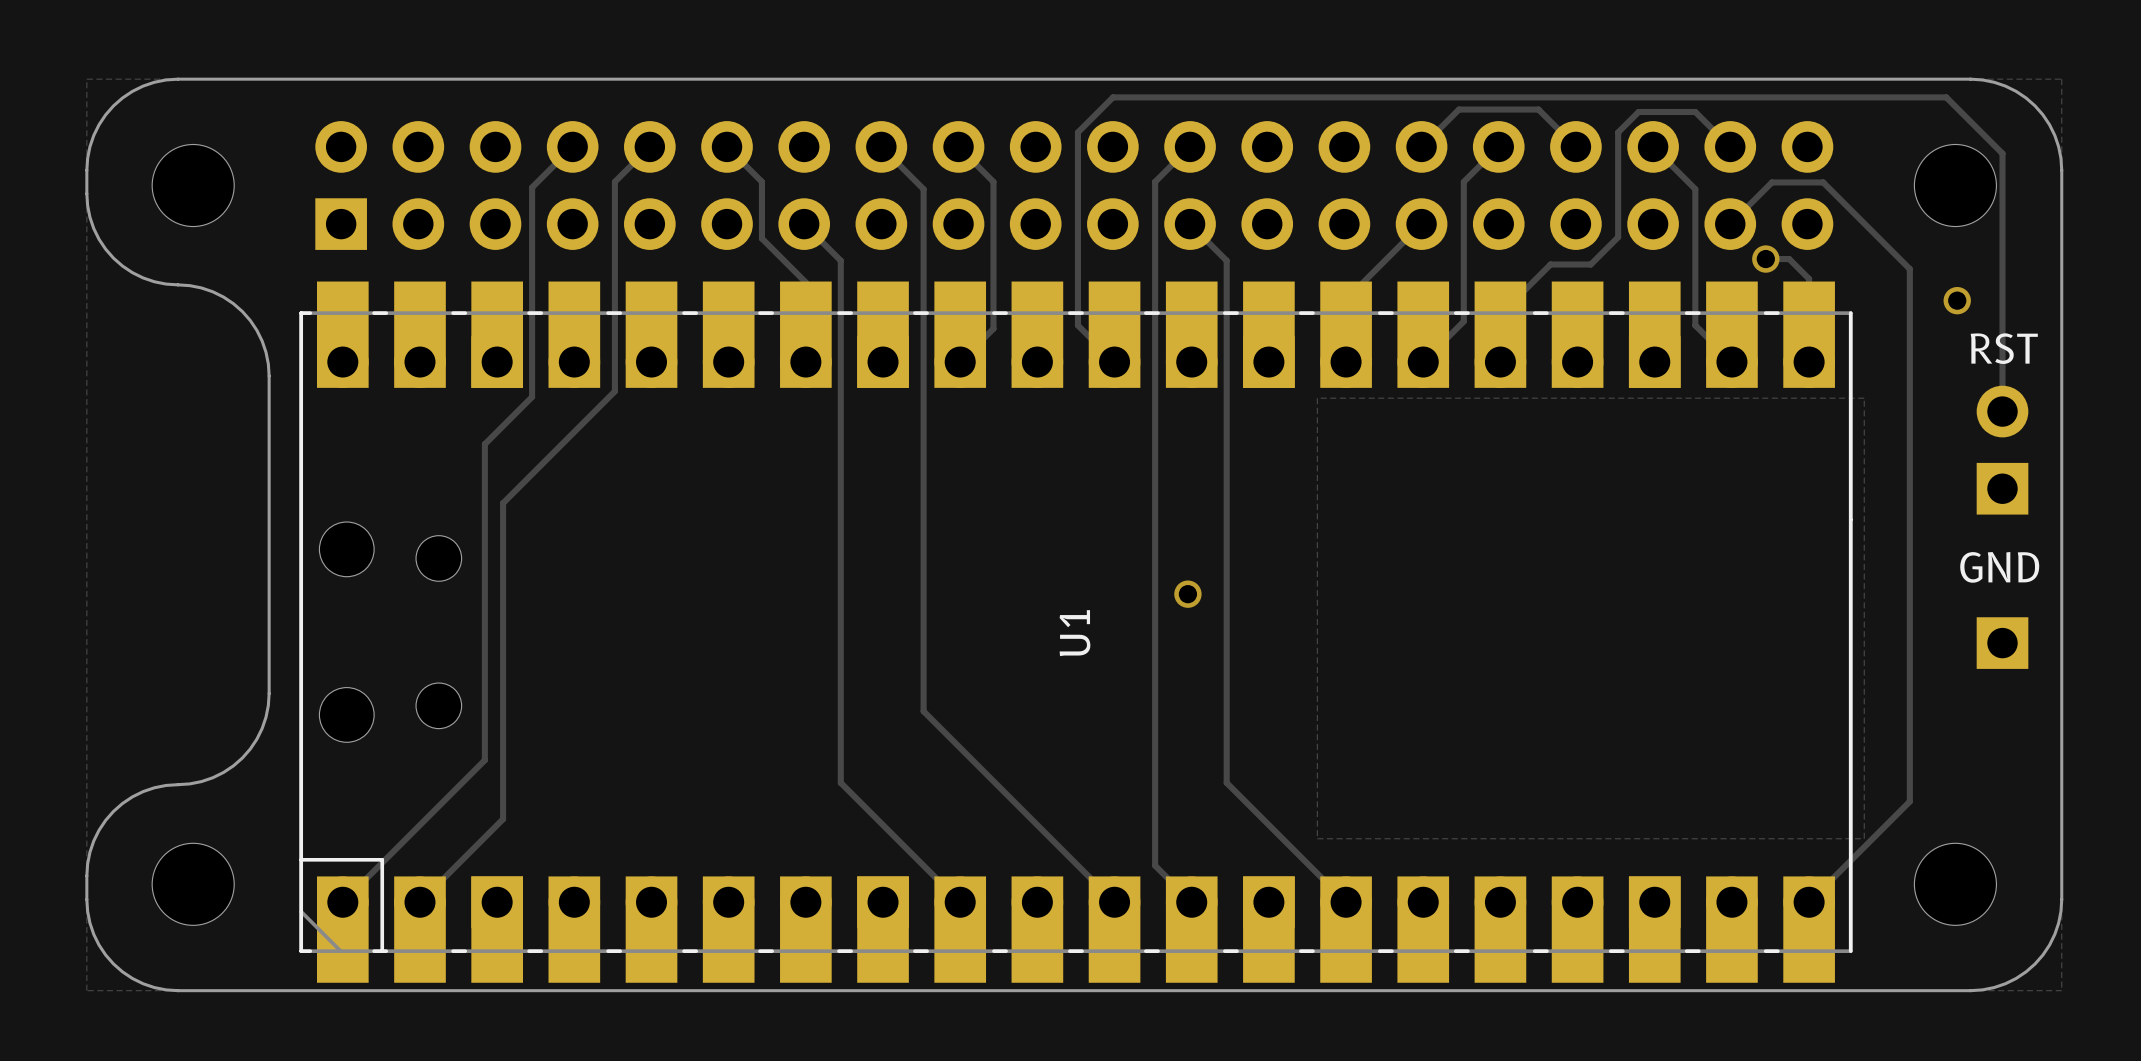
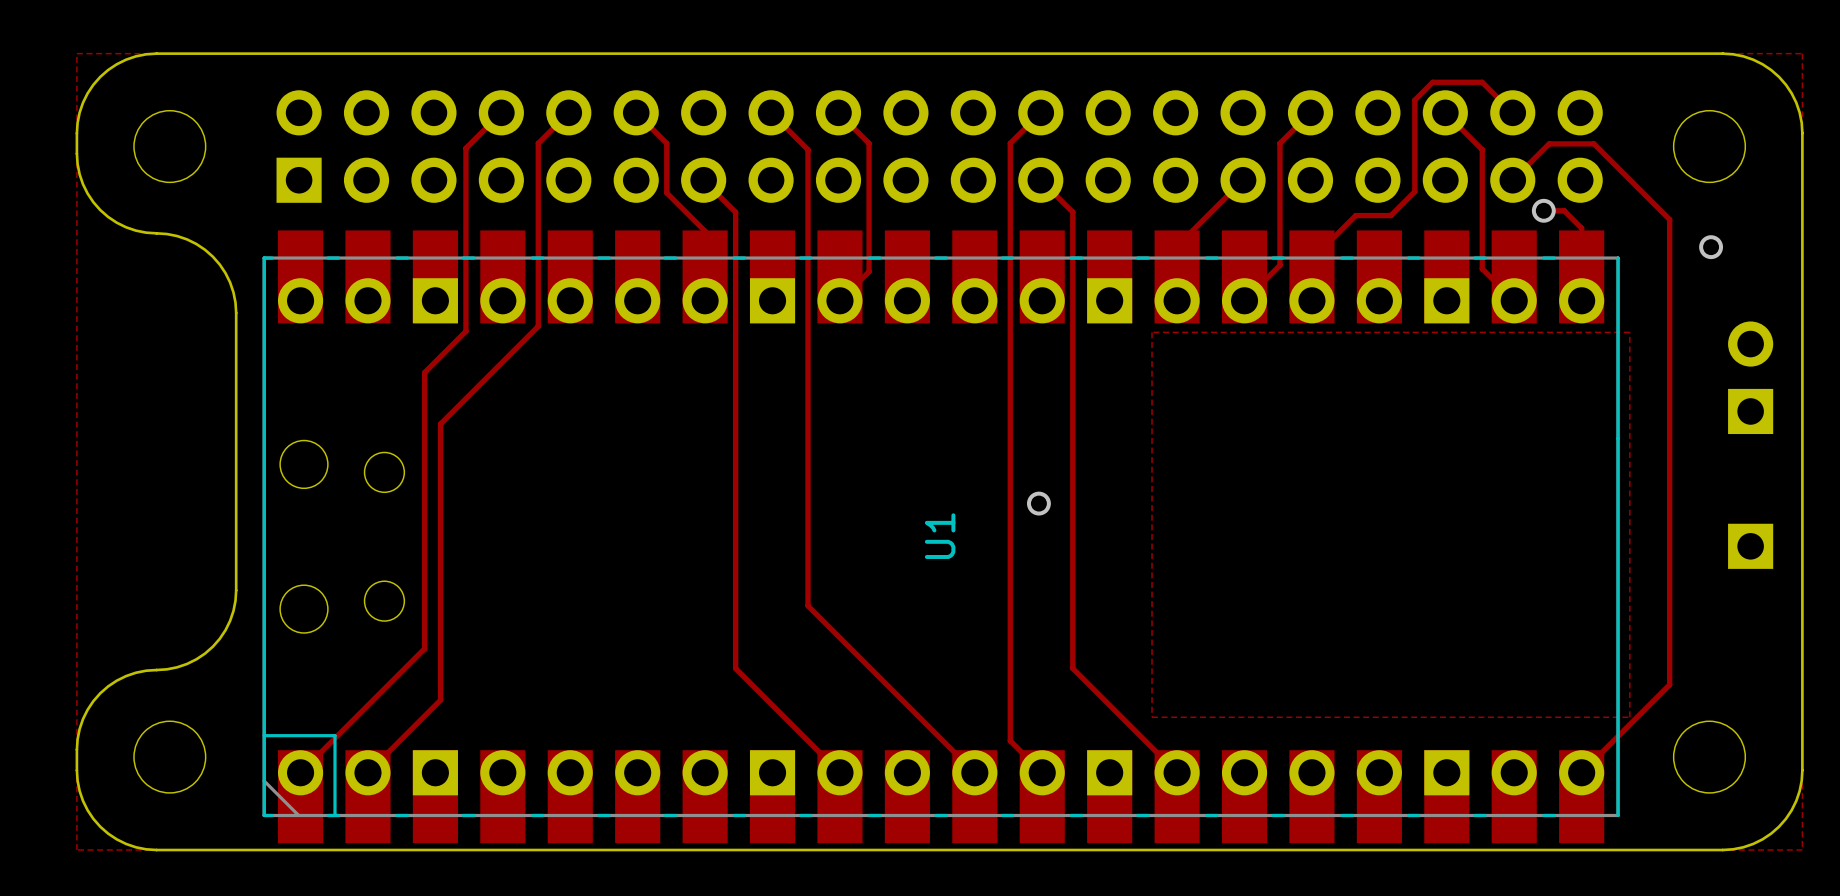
track: (1421, 146) (1458, 109) (1538, 109) (1575, 146) -> none
text: RST (2004, 348) -> none
track: (1114, 362) (1077, 325) (1077, 132) (1112, 97) (1946, 97) (2002, 153) (2002, 411) -> none
text: GND (1999, 567) -> none

